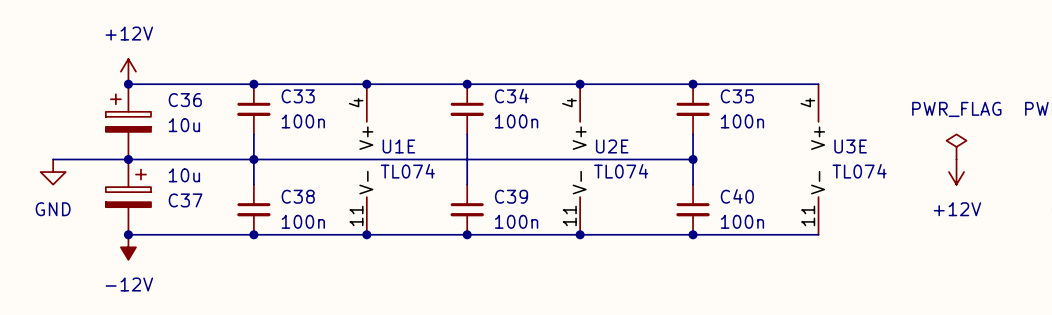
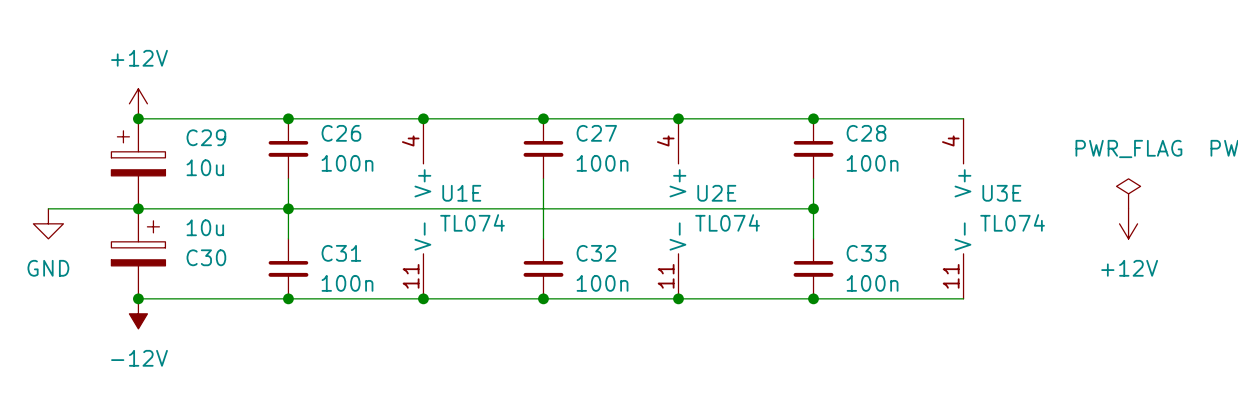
C33 name: C33 (298, 96) -> C26 (341, 133)
C34 name: C34 (511, 96) -> C27 (596, 133)
C35 name: C35 (737, 96) -> C28 (866, 133)
C36 name: C36 (185, 100) -> C29 (206, 137)
C38 name: C38 (298, 196) -> C31 (341, 253)
C39 name: C39 (511, 196) -> C32 (596, 253)
C40 name: C40 (737, 196) -> C33 (866, 253)
C37 name: C37 (185, 200) -> C30 (206, 257)

